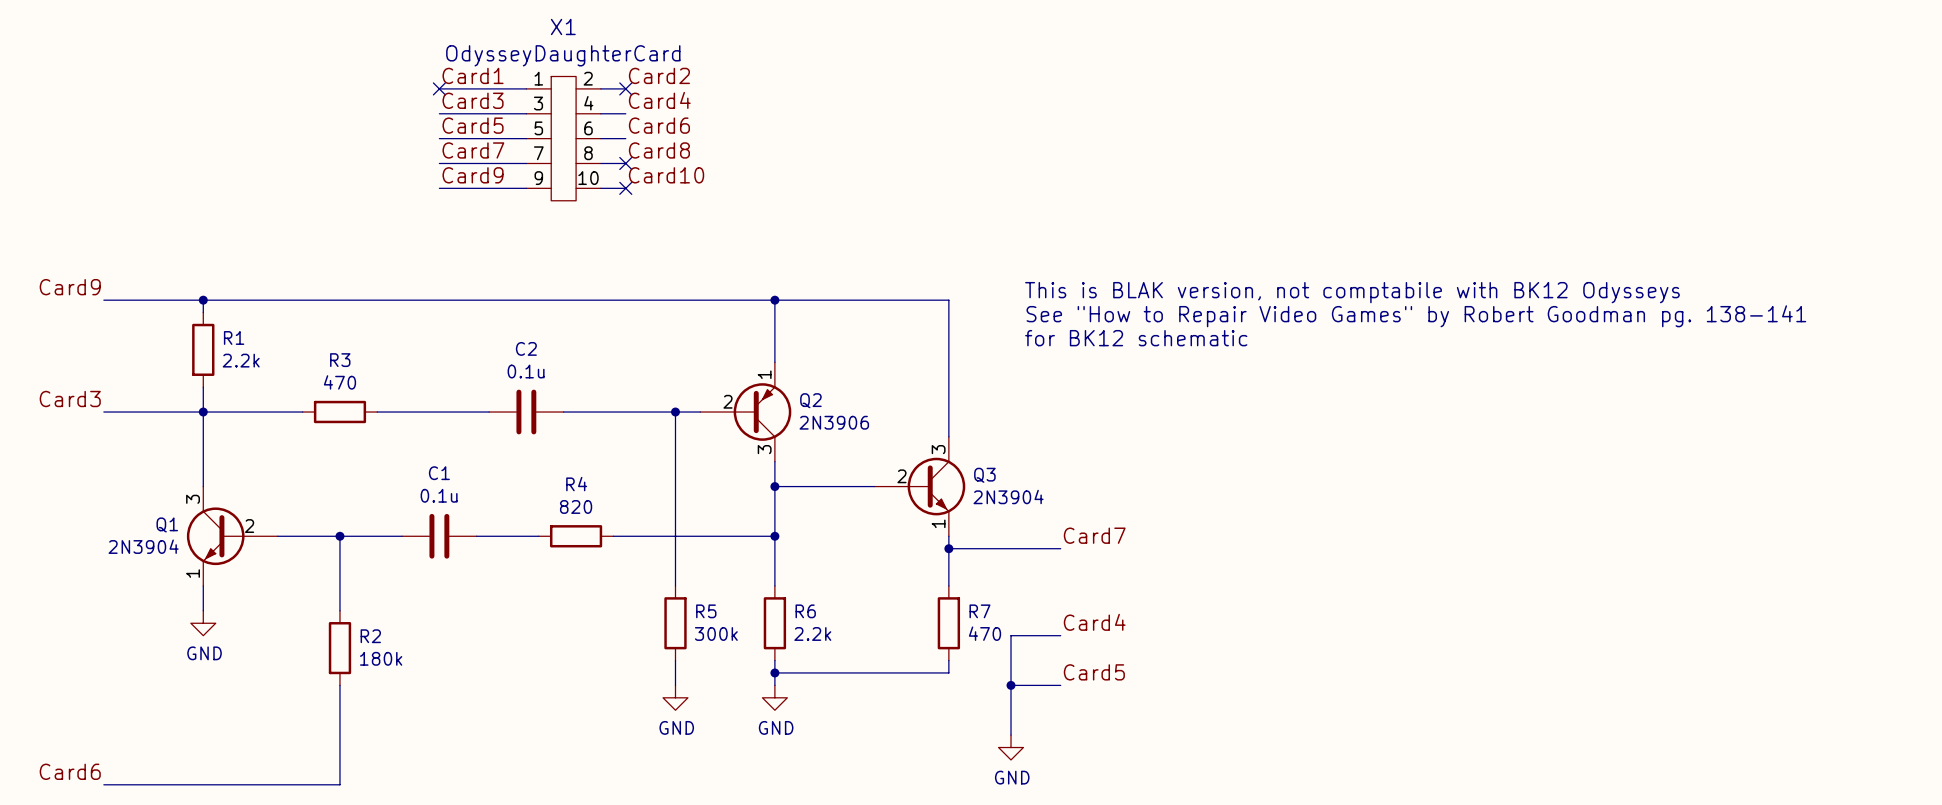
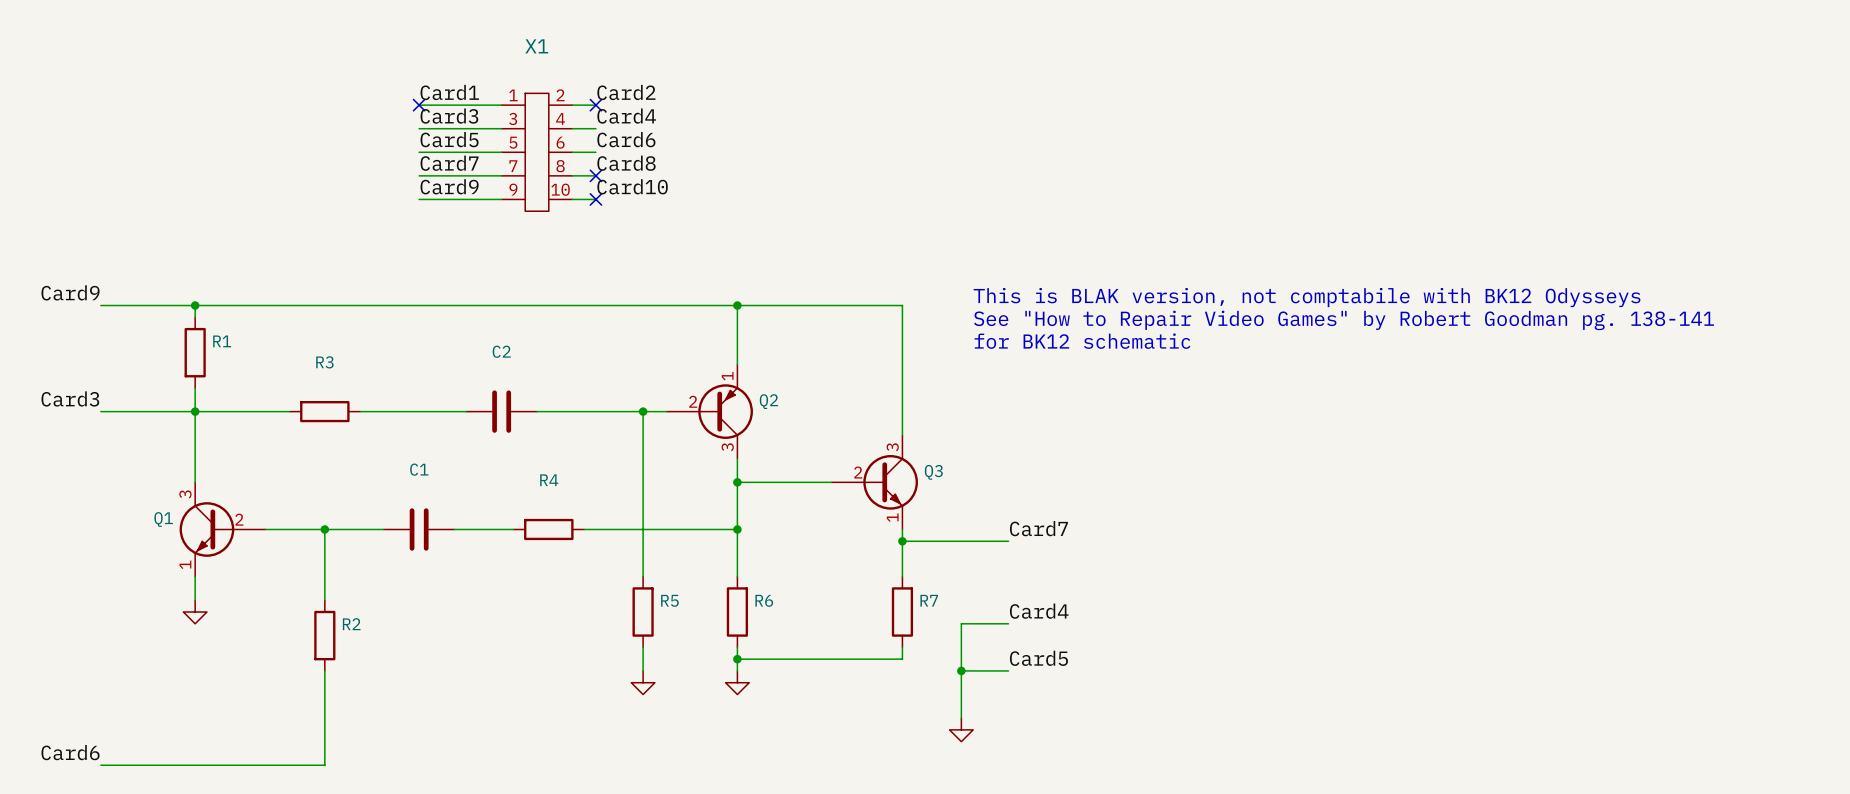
X1 value: OdysseyDaughterCard (563, 55) -> none
R1 value: 2.2k (241, 360) -> none
C2 value: 0.1u (526, 371) -> none
R3 value: 470 (339, 382) -> none
Q2 value: 2N3906 (834, 422) -> none
C1 value: 0.1u (439, 495) -> none
Q3 value: 2N3904 (1008, 496) -> none
R4 value: 820 (576, 506) -> none
Q1 value: 2N3904 (143, 546) -> none
R5 value: 300k (716, 633) -> none
R6 value: 2.2k (812, 633) -> none
R7 value: 470 (985, 633) -> none
power symbol text: GND (204, 653) -> none
R2 value: 180k (381, 658) -> none
power symbol text: GND (676, 727) -> none
power symbol text: GND (776, 727) -> none
power symbol text: GND (1012, 777) -> none

